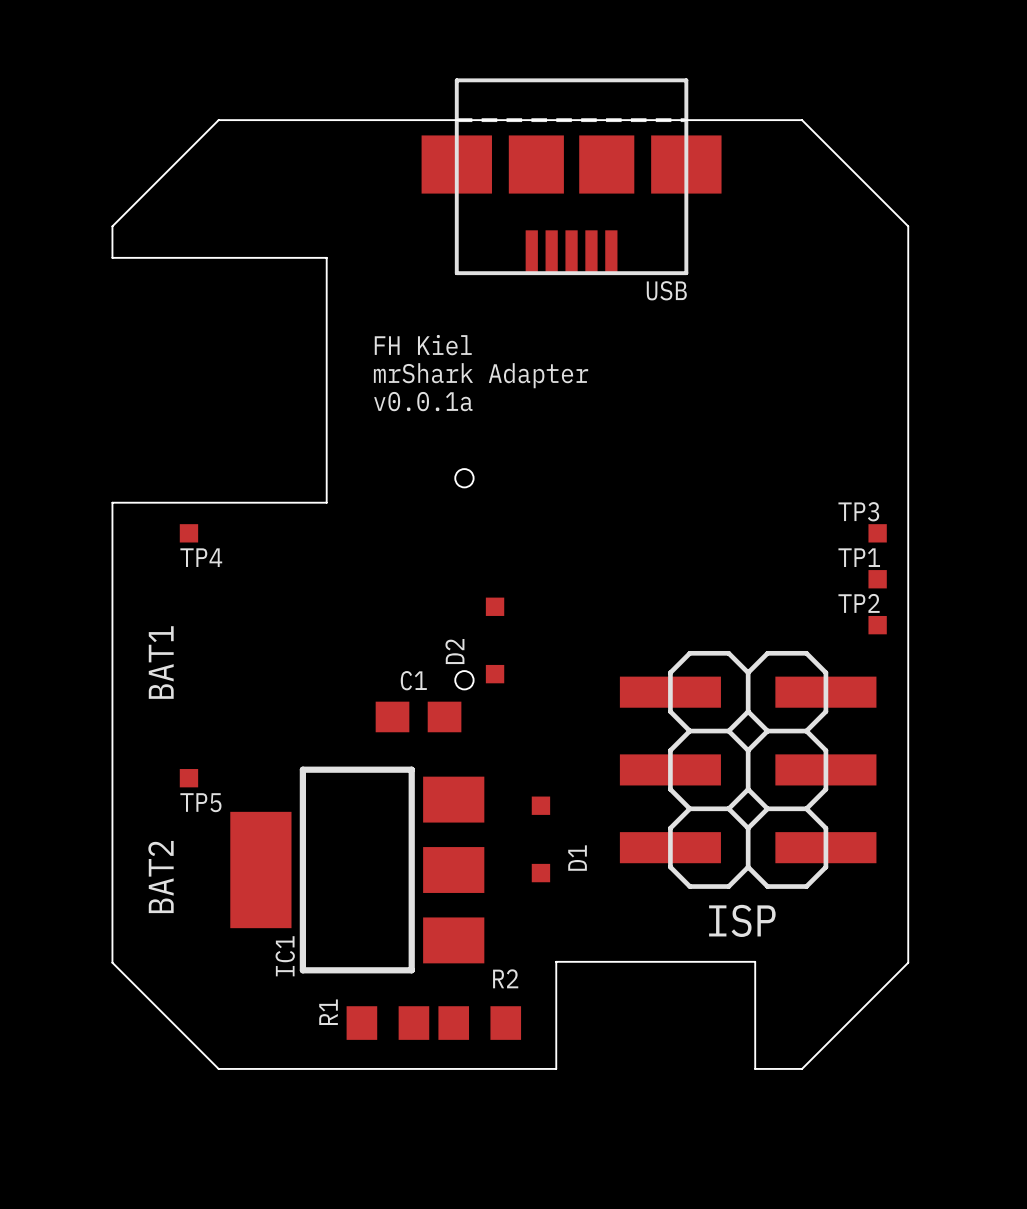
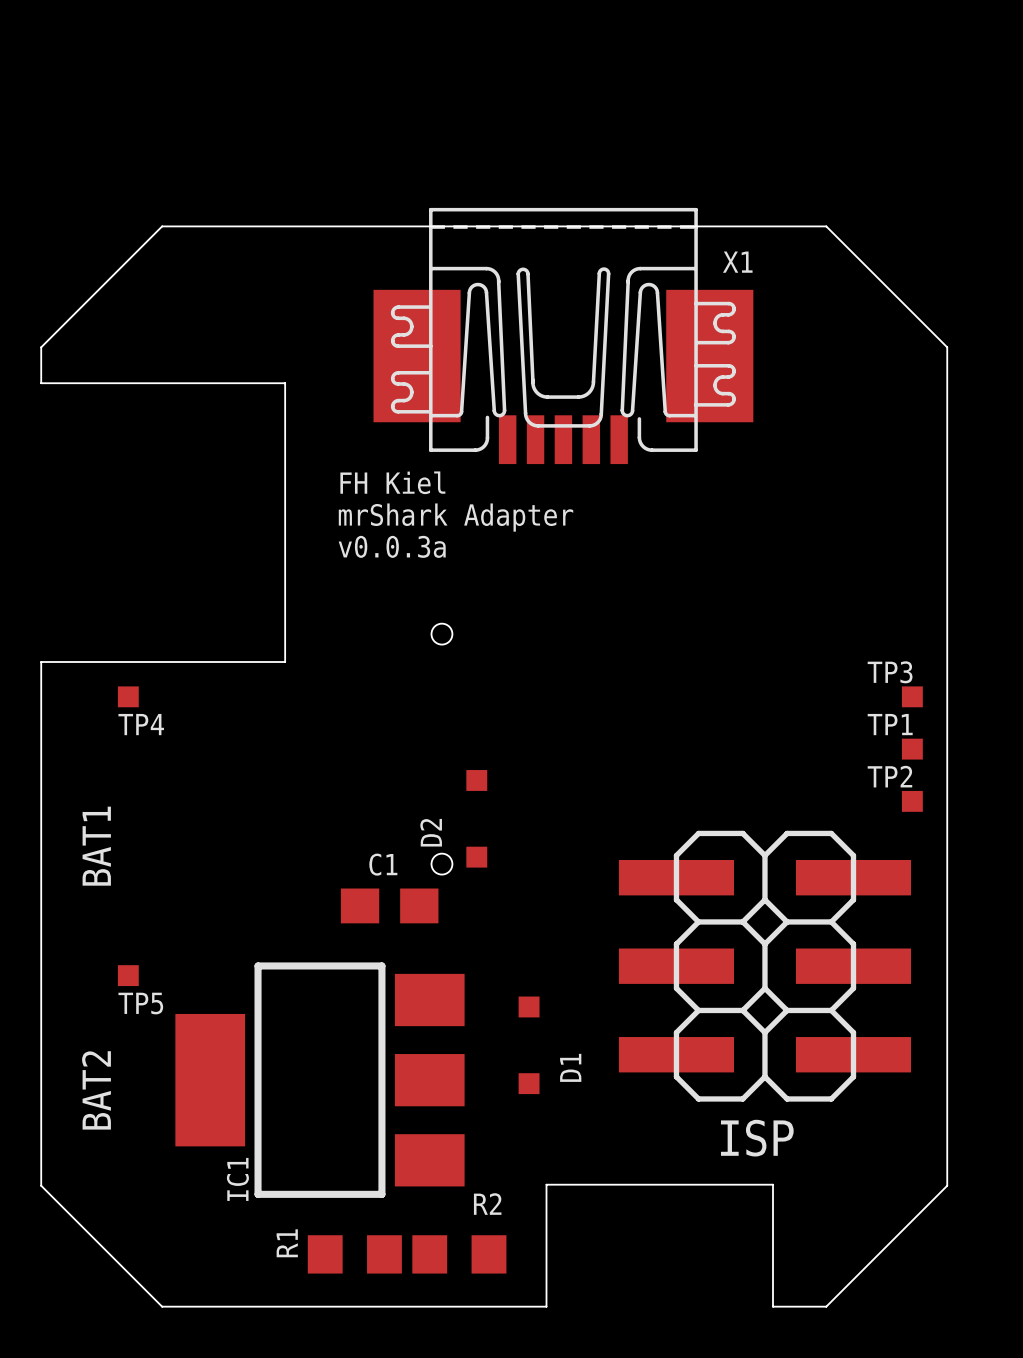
USB: (571, 176) -> none
X1: none -> (563, 335)
text: v0.0.1a (423, 401) -> v0.0.3a (392, 546)

